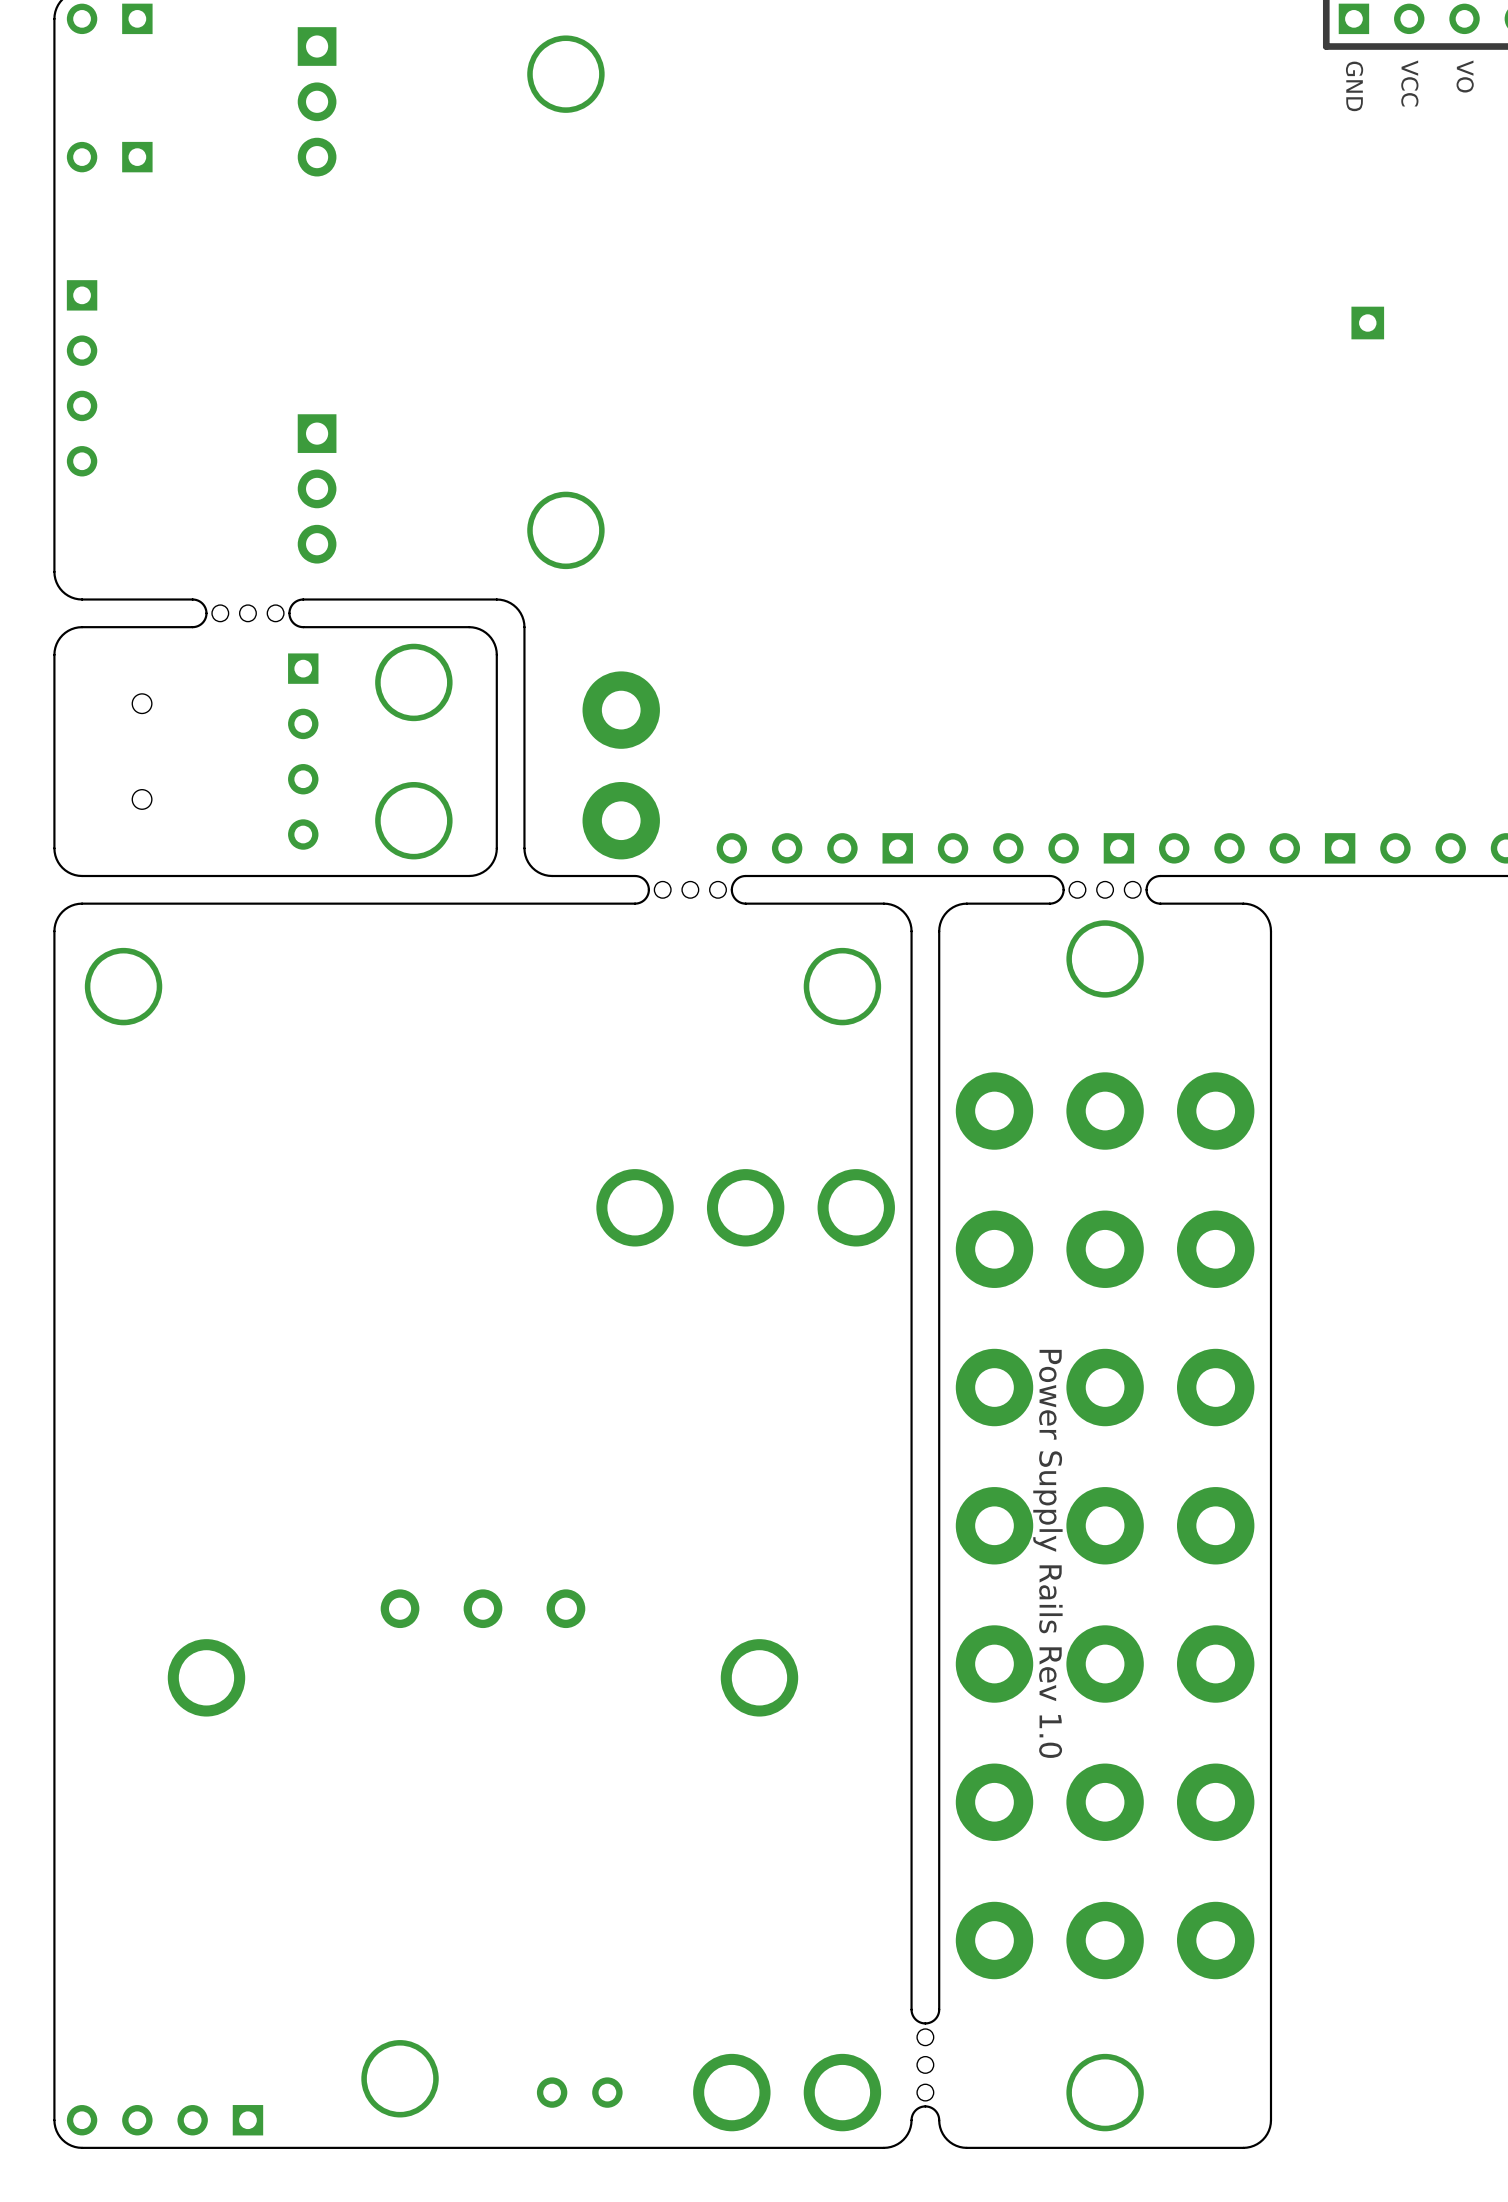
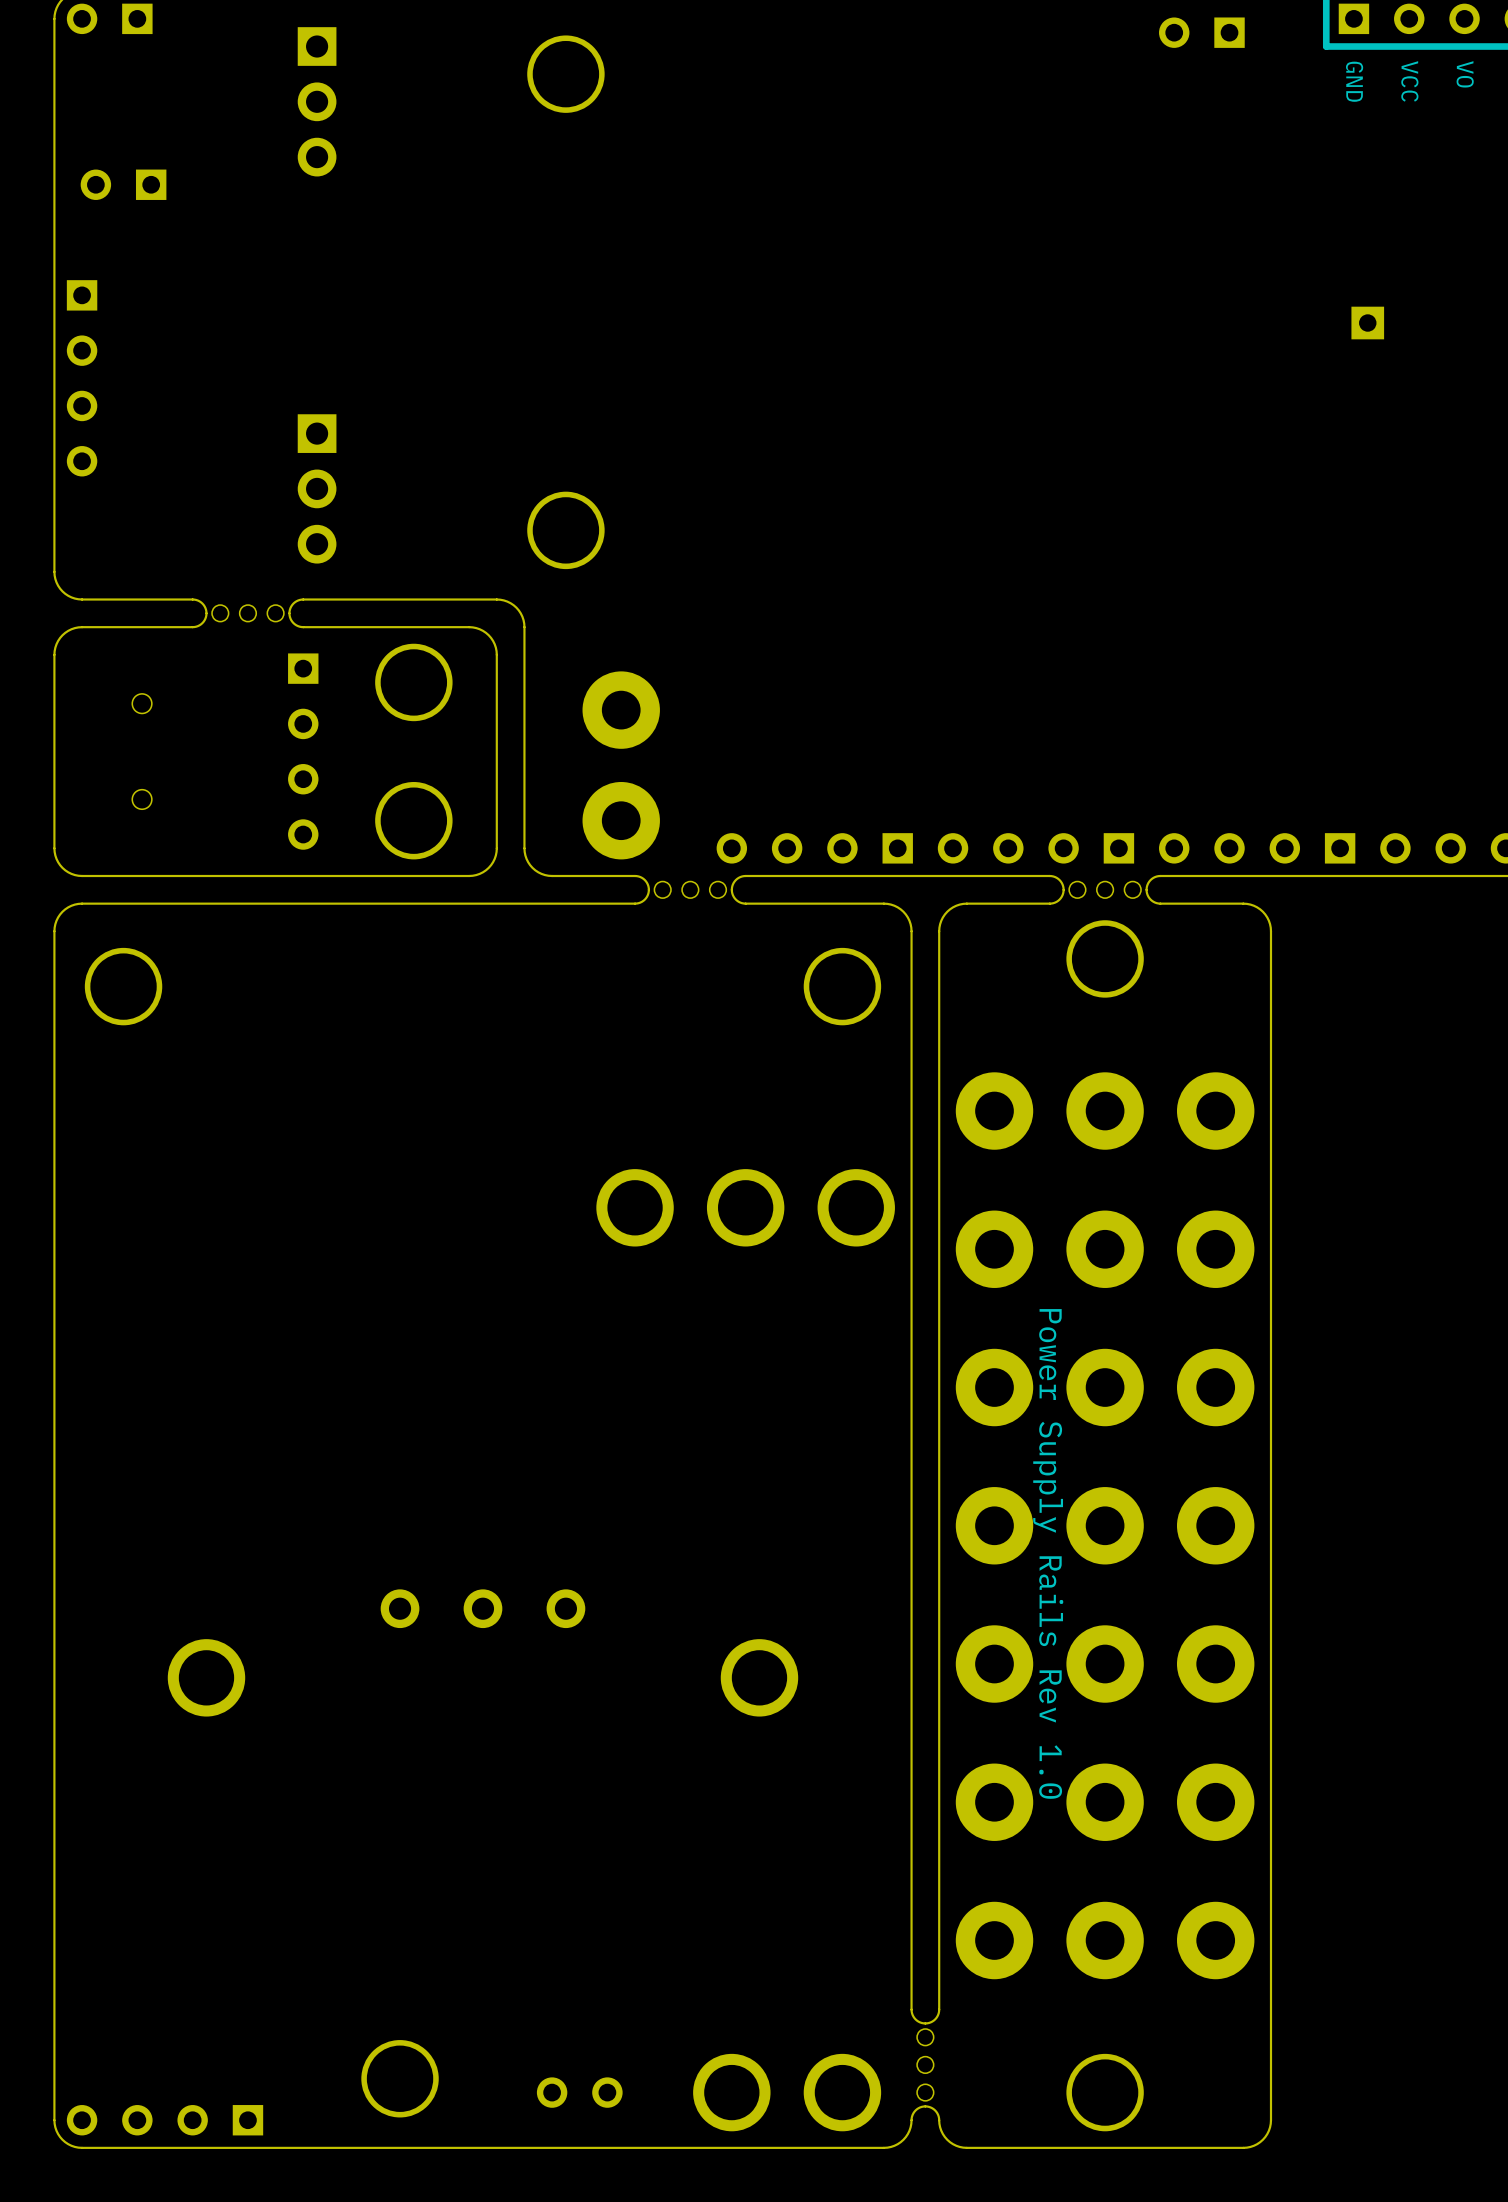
part: none -> (1201, 32)
part position: (109, 157) -> (123, 184)

